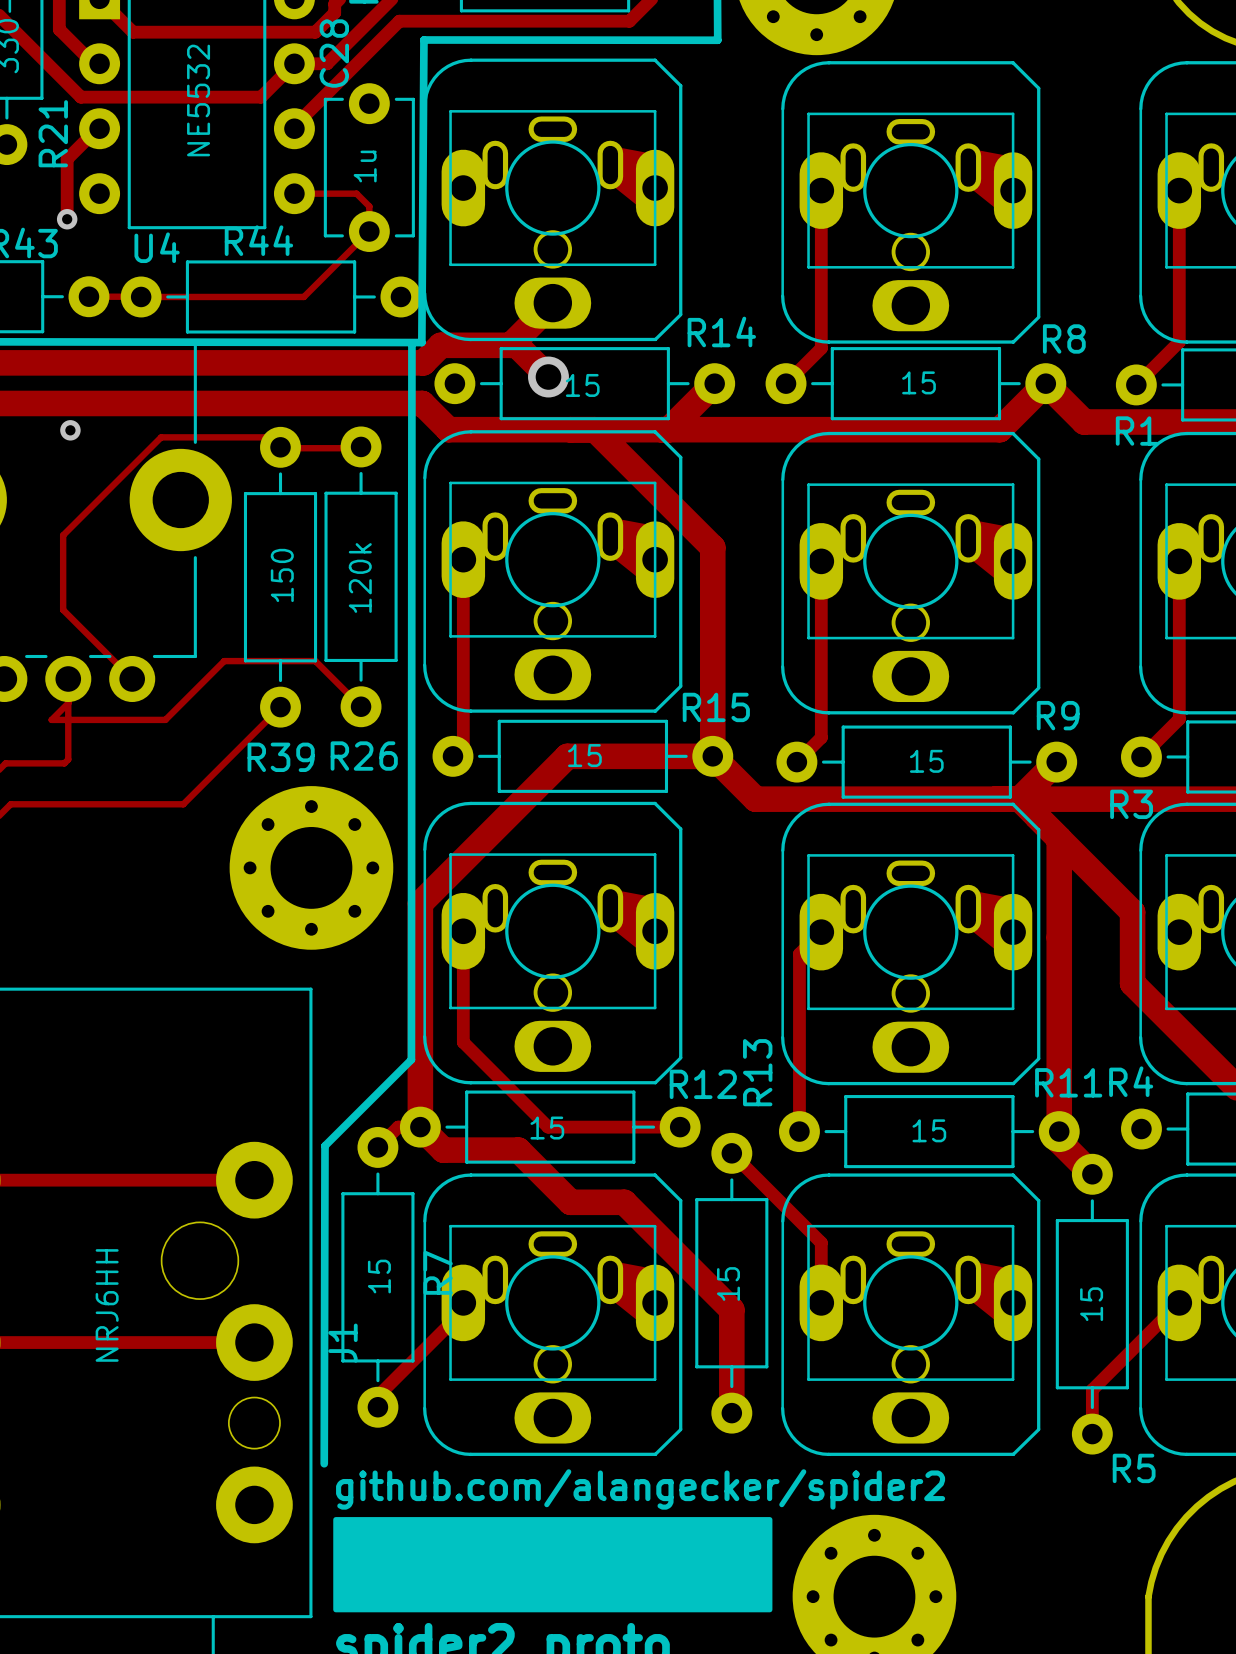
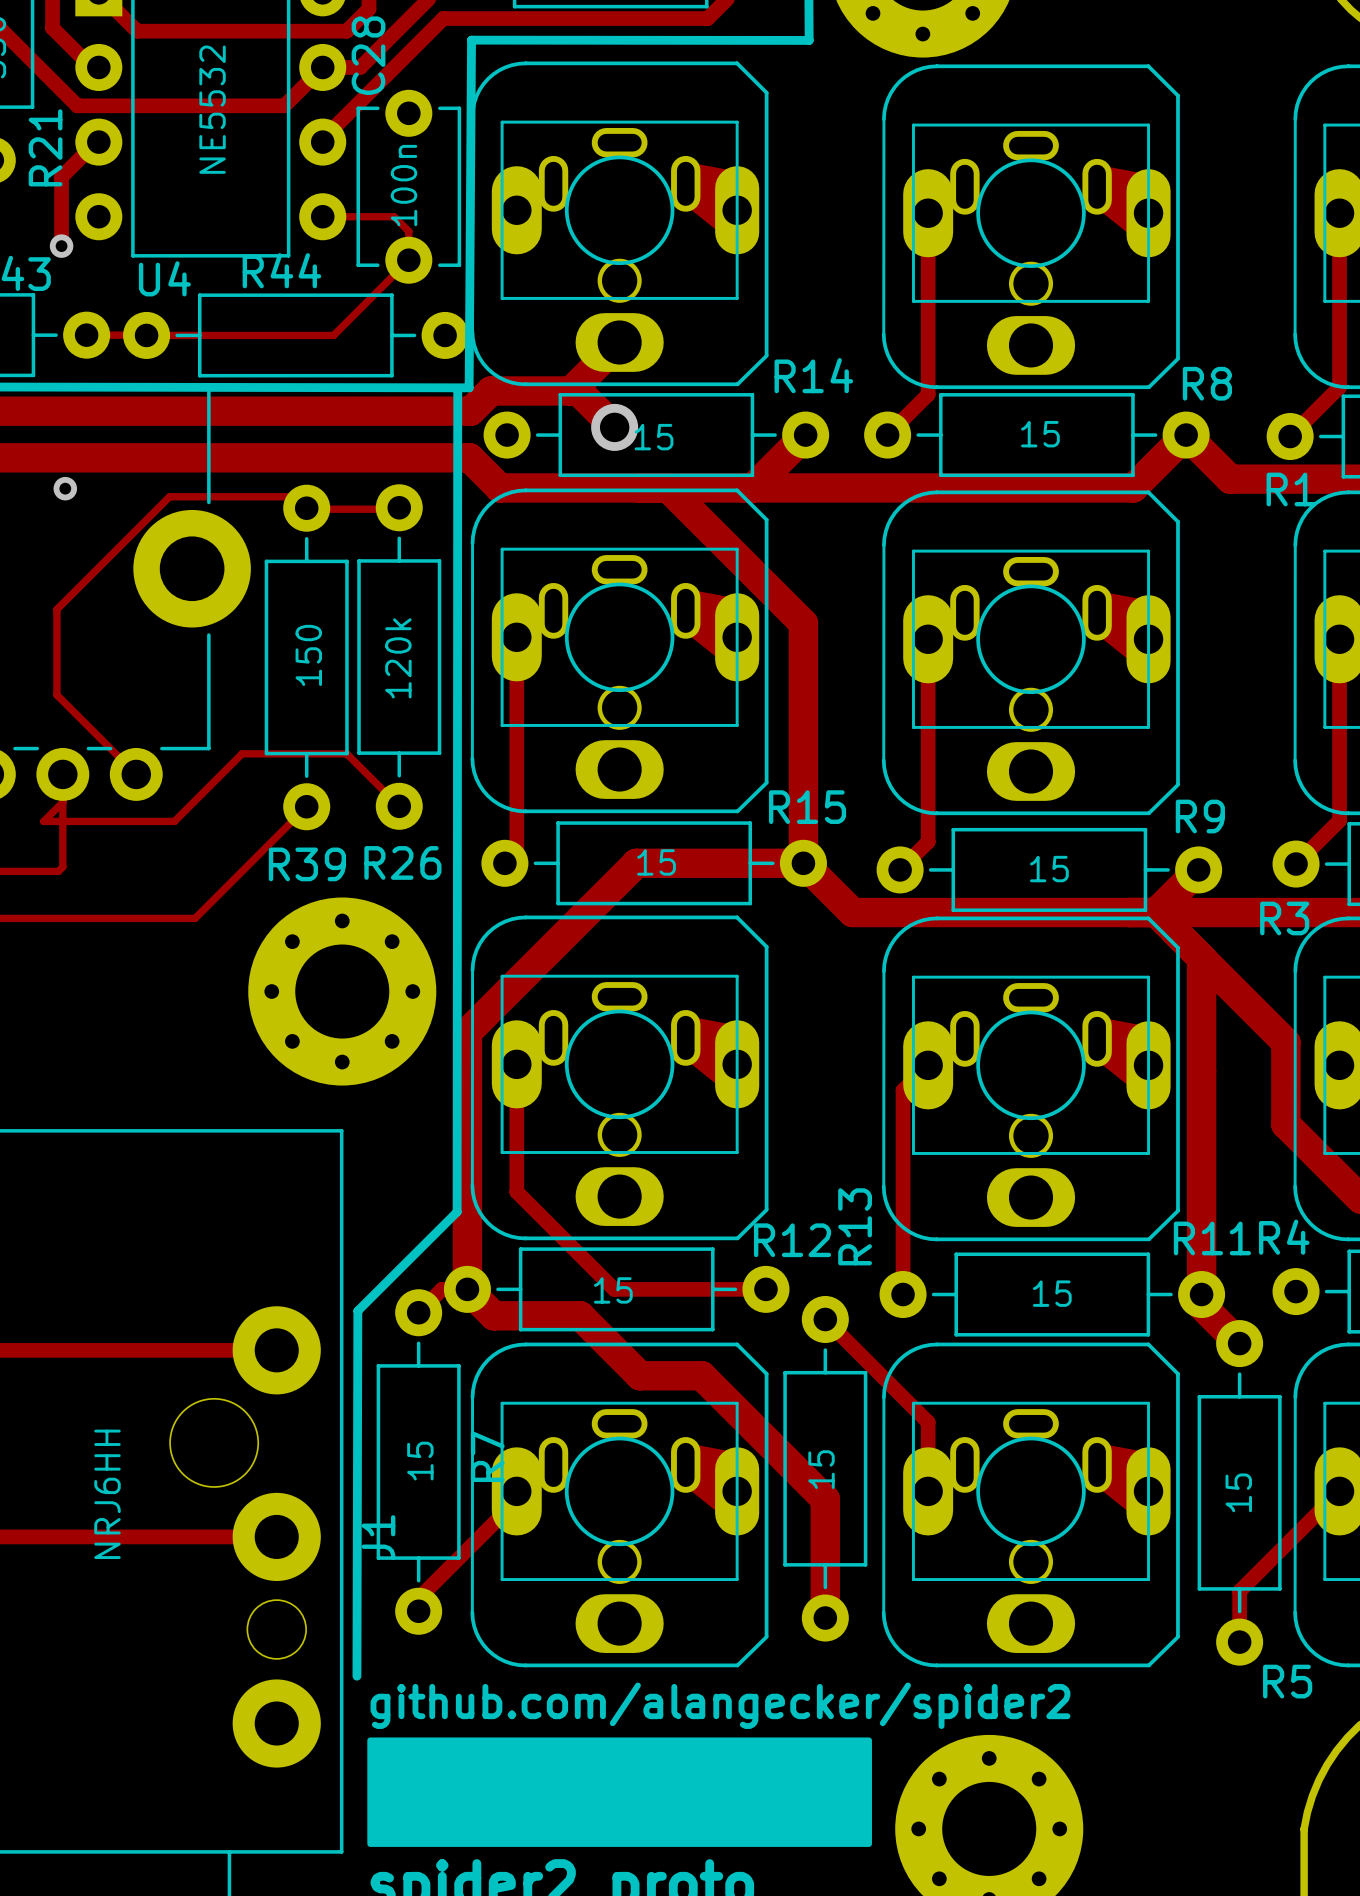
C28 value: 1u (365, 166) -> 100n (404, 185)

